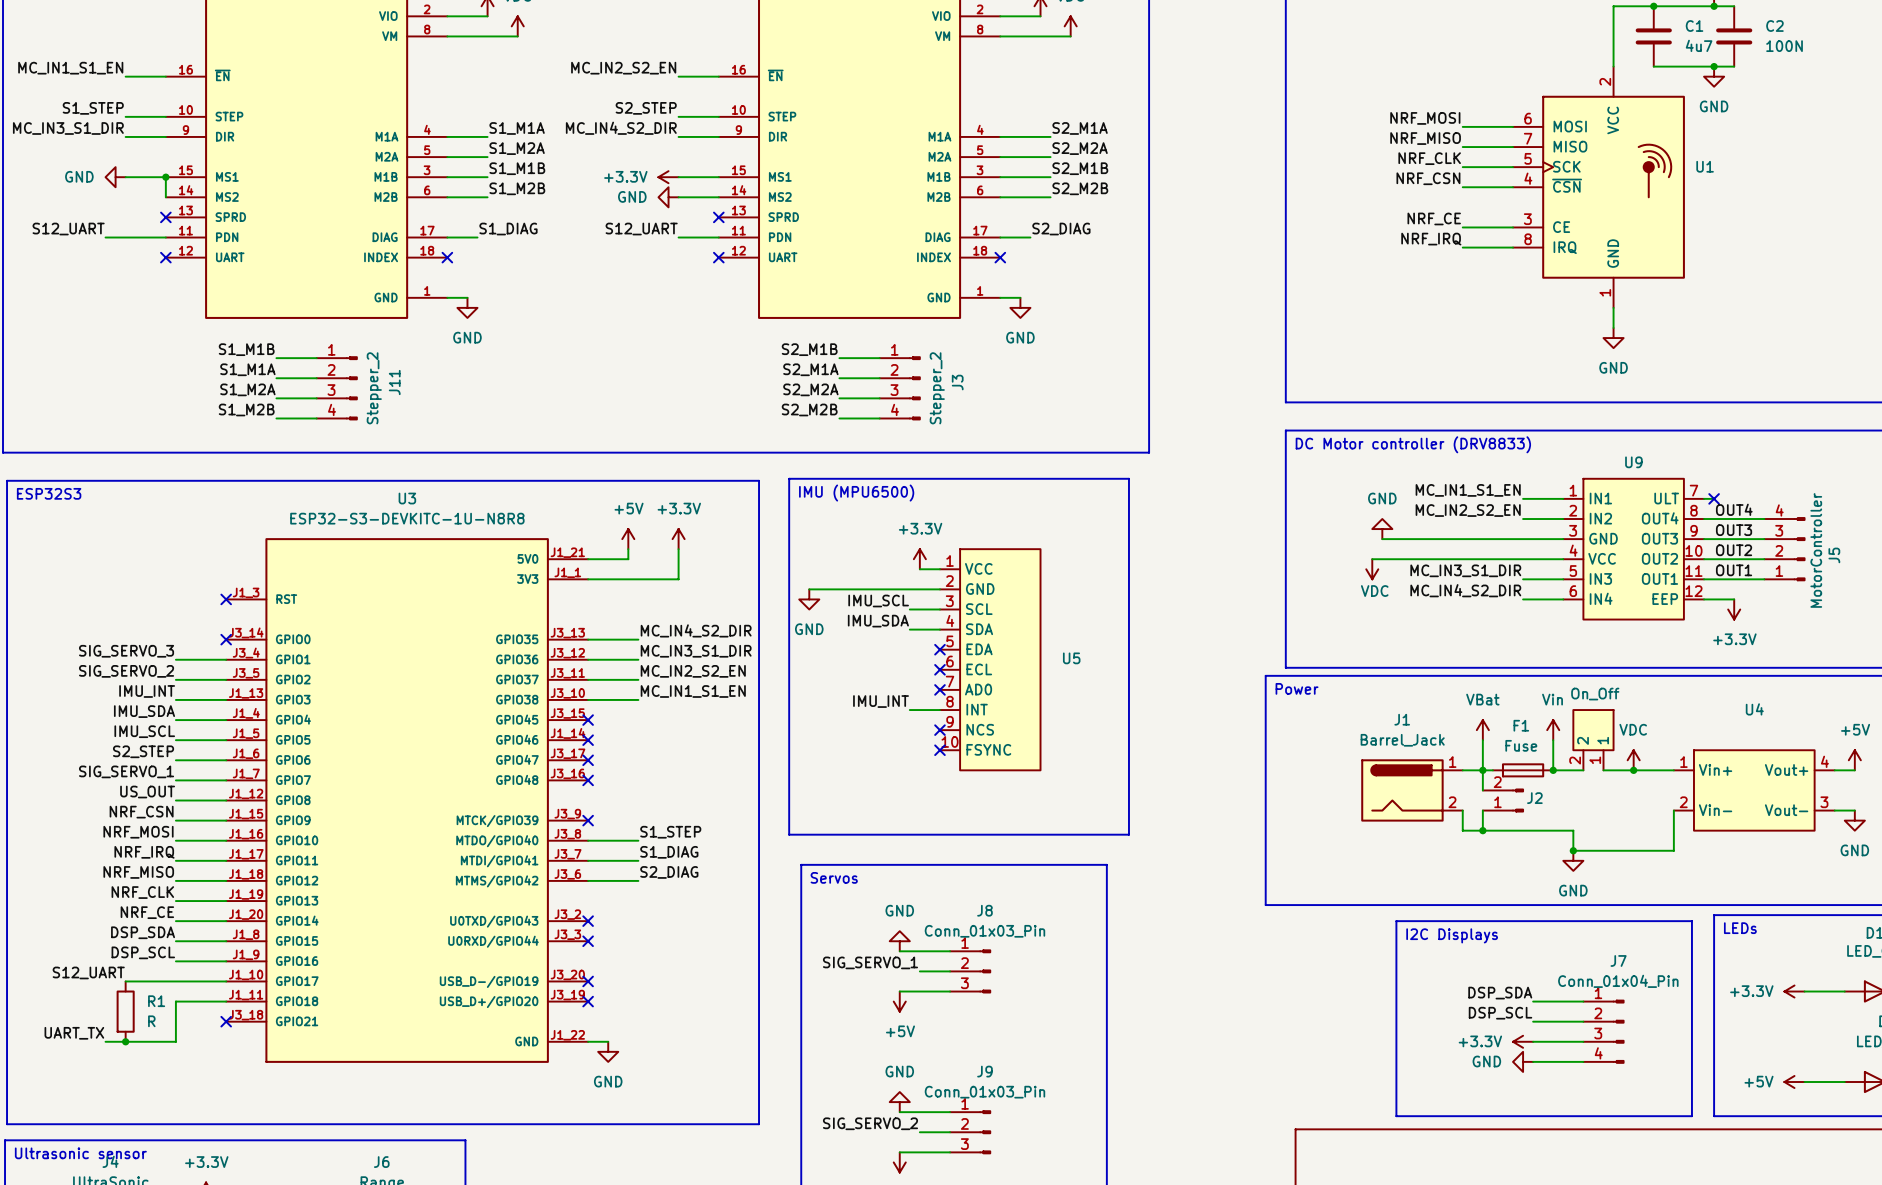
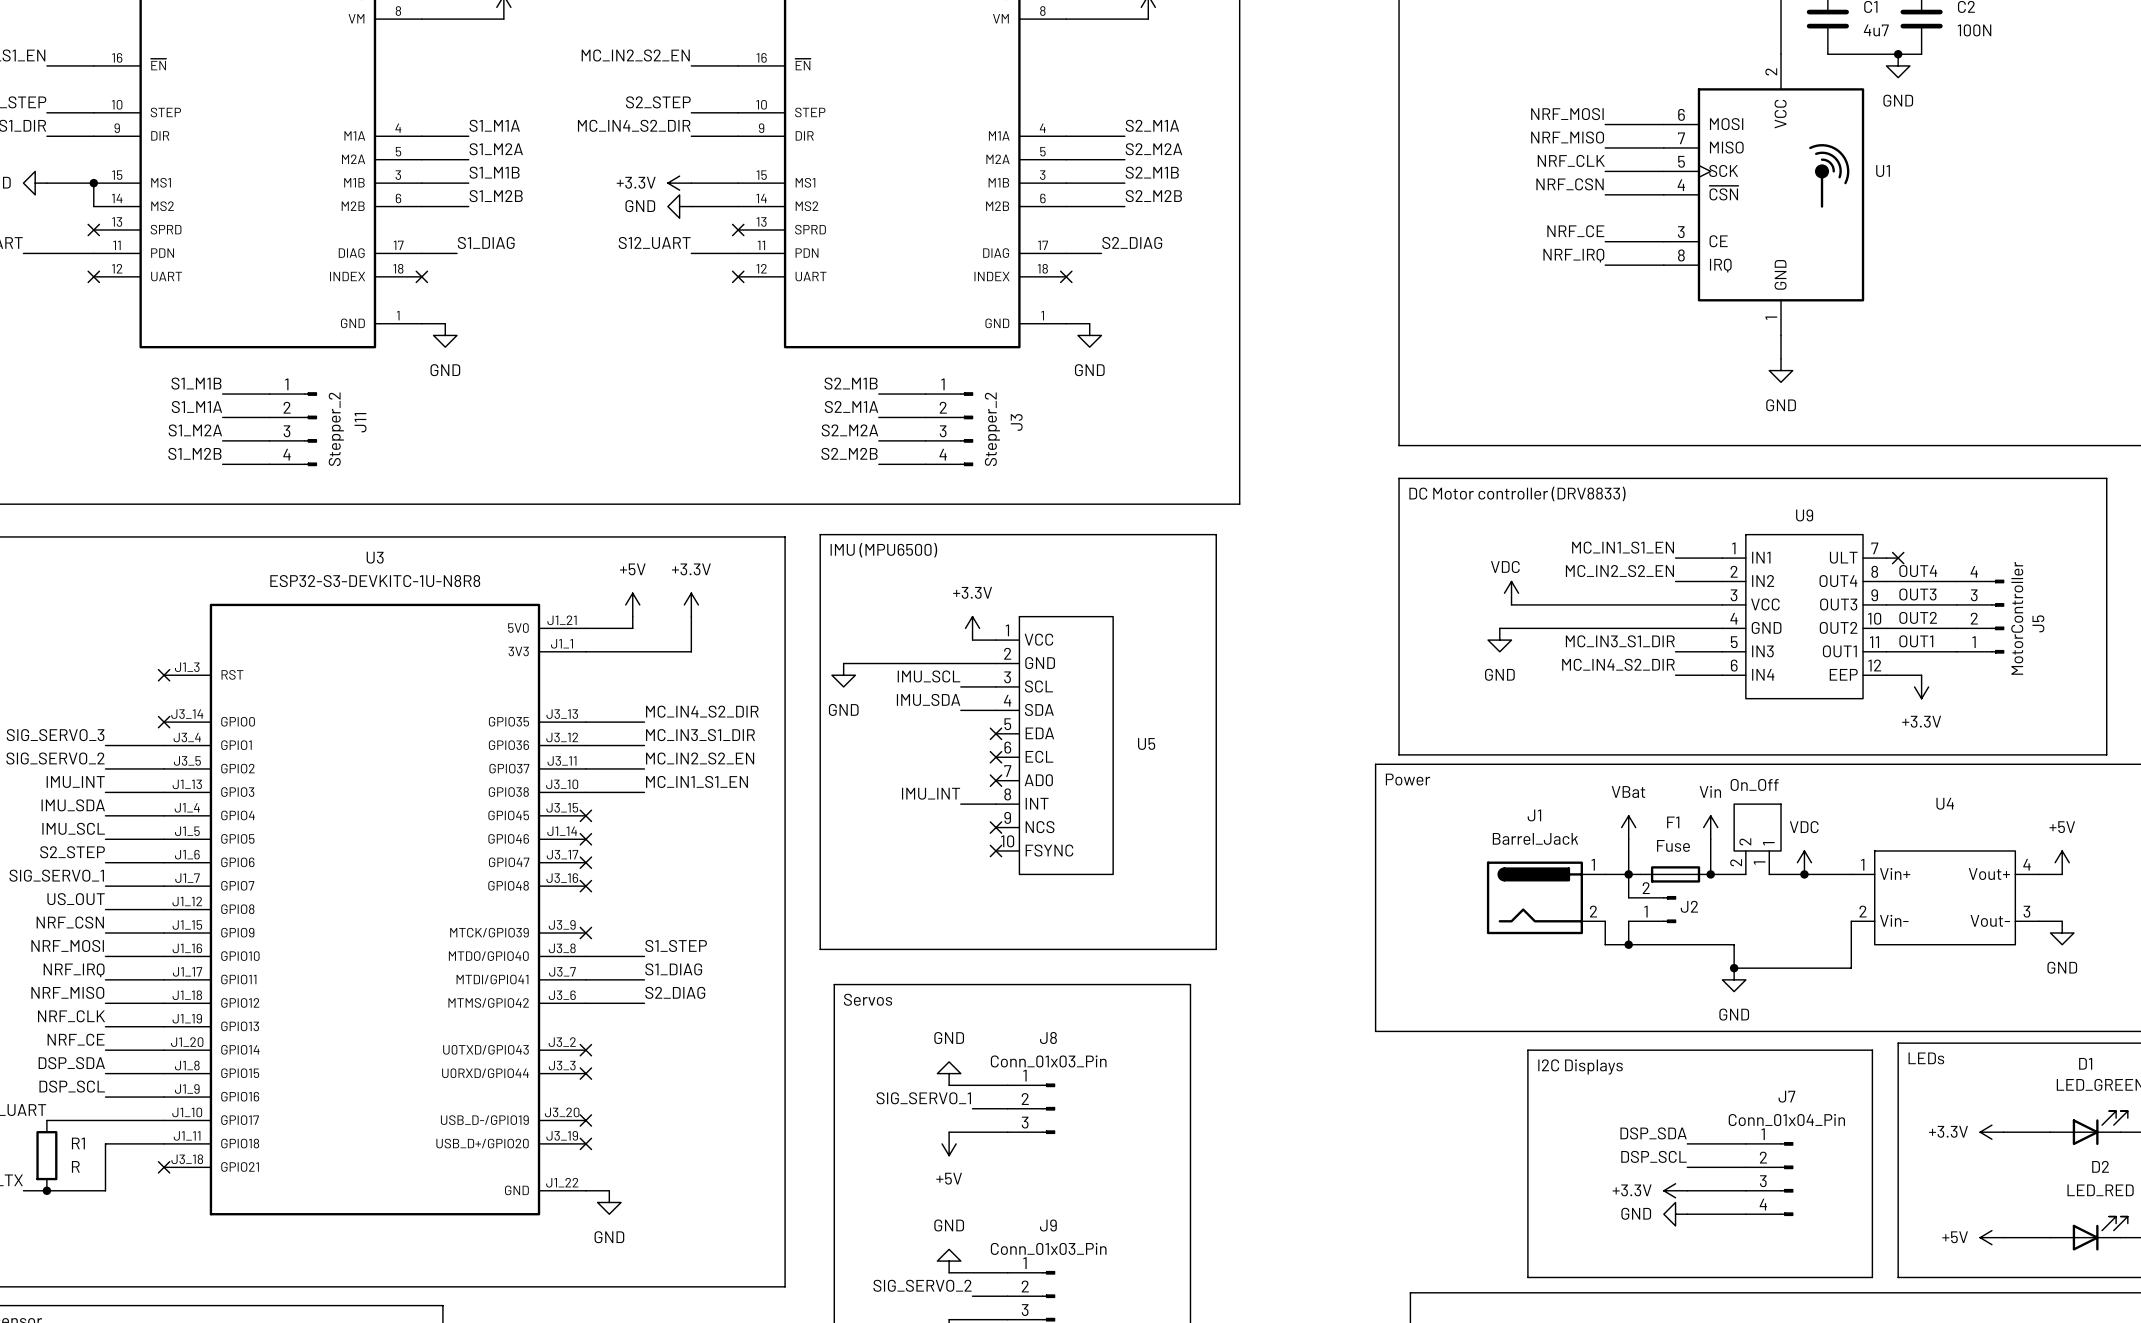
power symbol: GND (1382, 529) -> VDC (1511, 593)
U9 pin name: GND (1603, 538) -> VCC (1765, 604)
U9 pin name: VCC (1602, 558) -> GND (1766, 627)
power symbol: VDC (1372, 569) -> GND (1499, 640)

